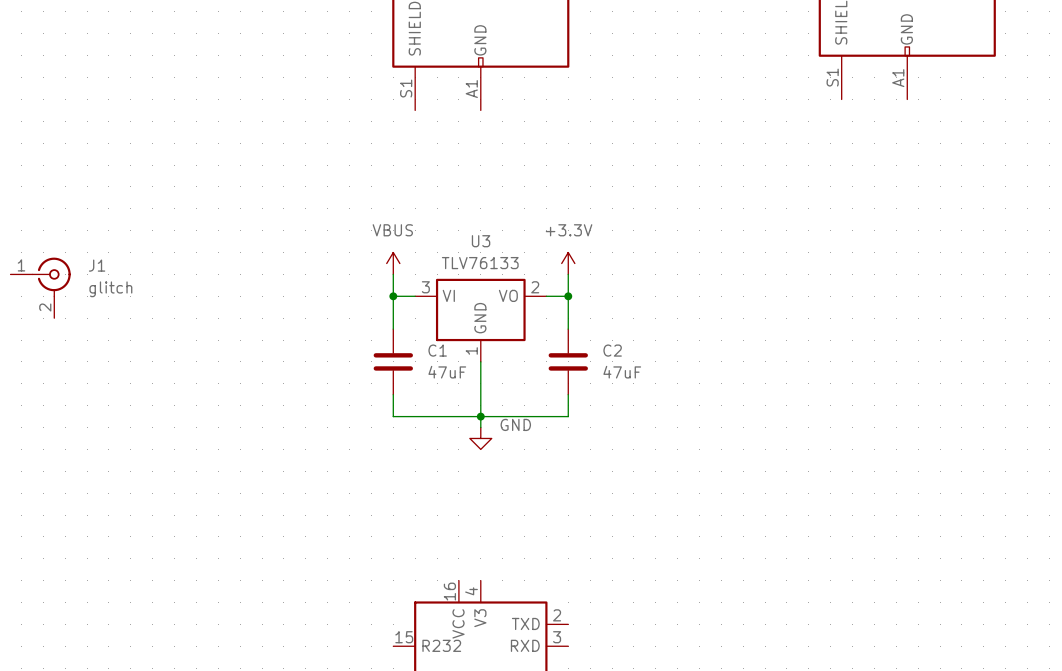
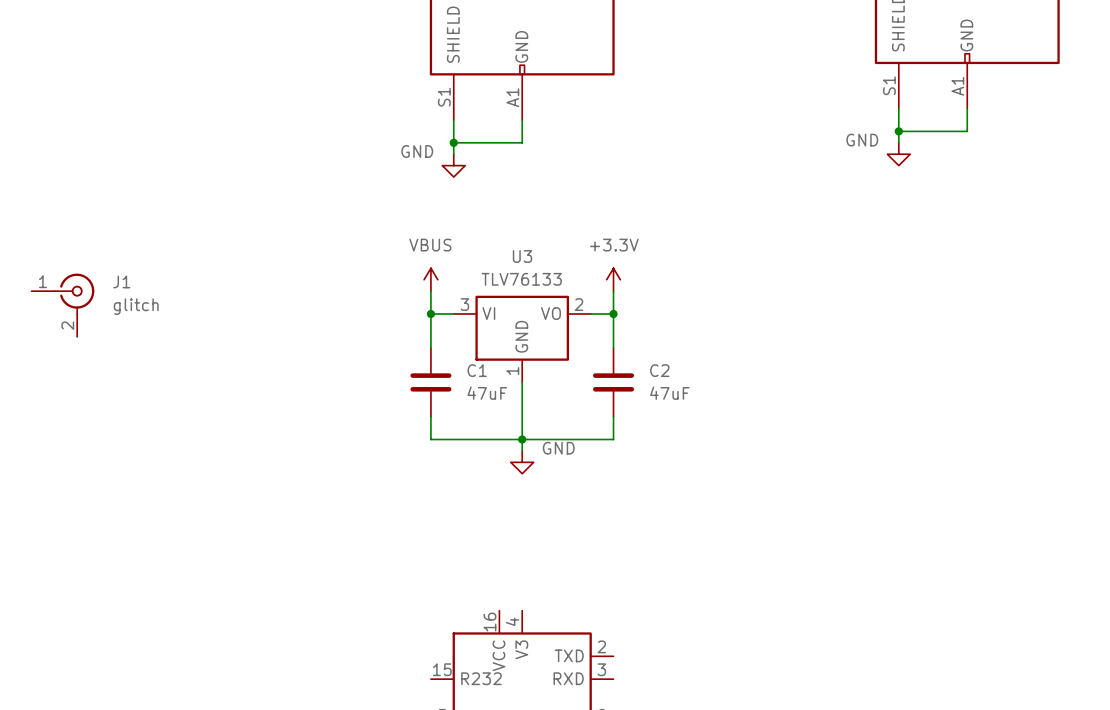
wire: none -> (898, 108) (898, 142)
wire: none -> (967, 108) (967, 131) (898, 131)
wire: none -> (453, 119) (453, 154)
wire: none -> (522, 119) (522, 142) (453, 142)
junction: none -> (898, 131)
junction: none -> (453, 142)
power symbol: none -> GND (898, 154)
power symbol: none -> GND (453, 165)

